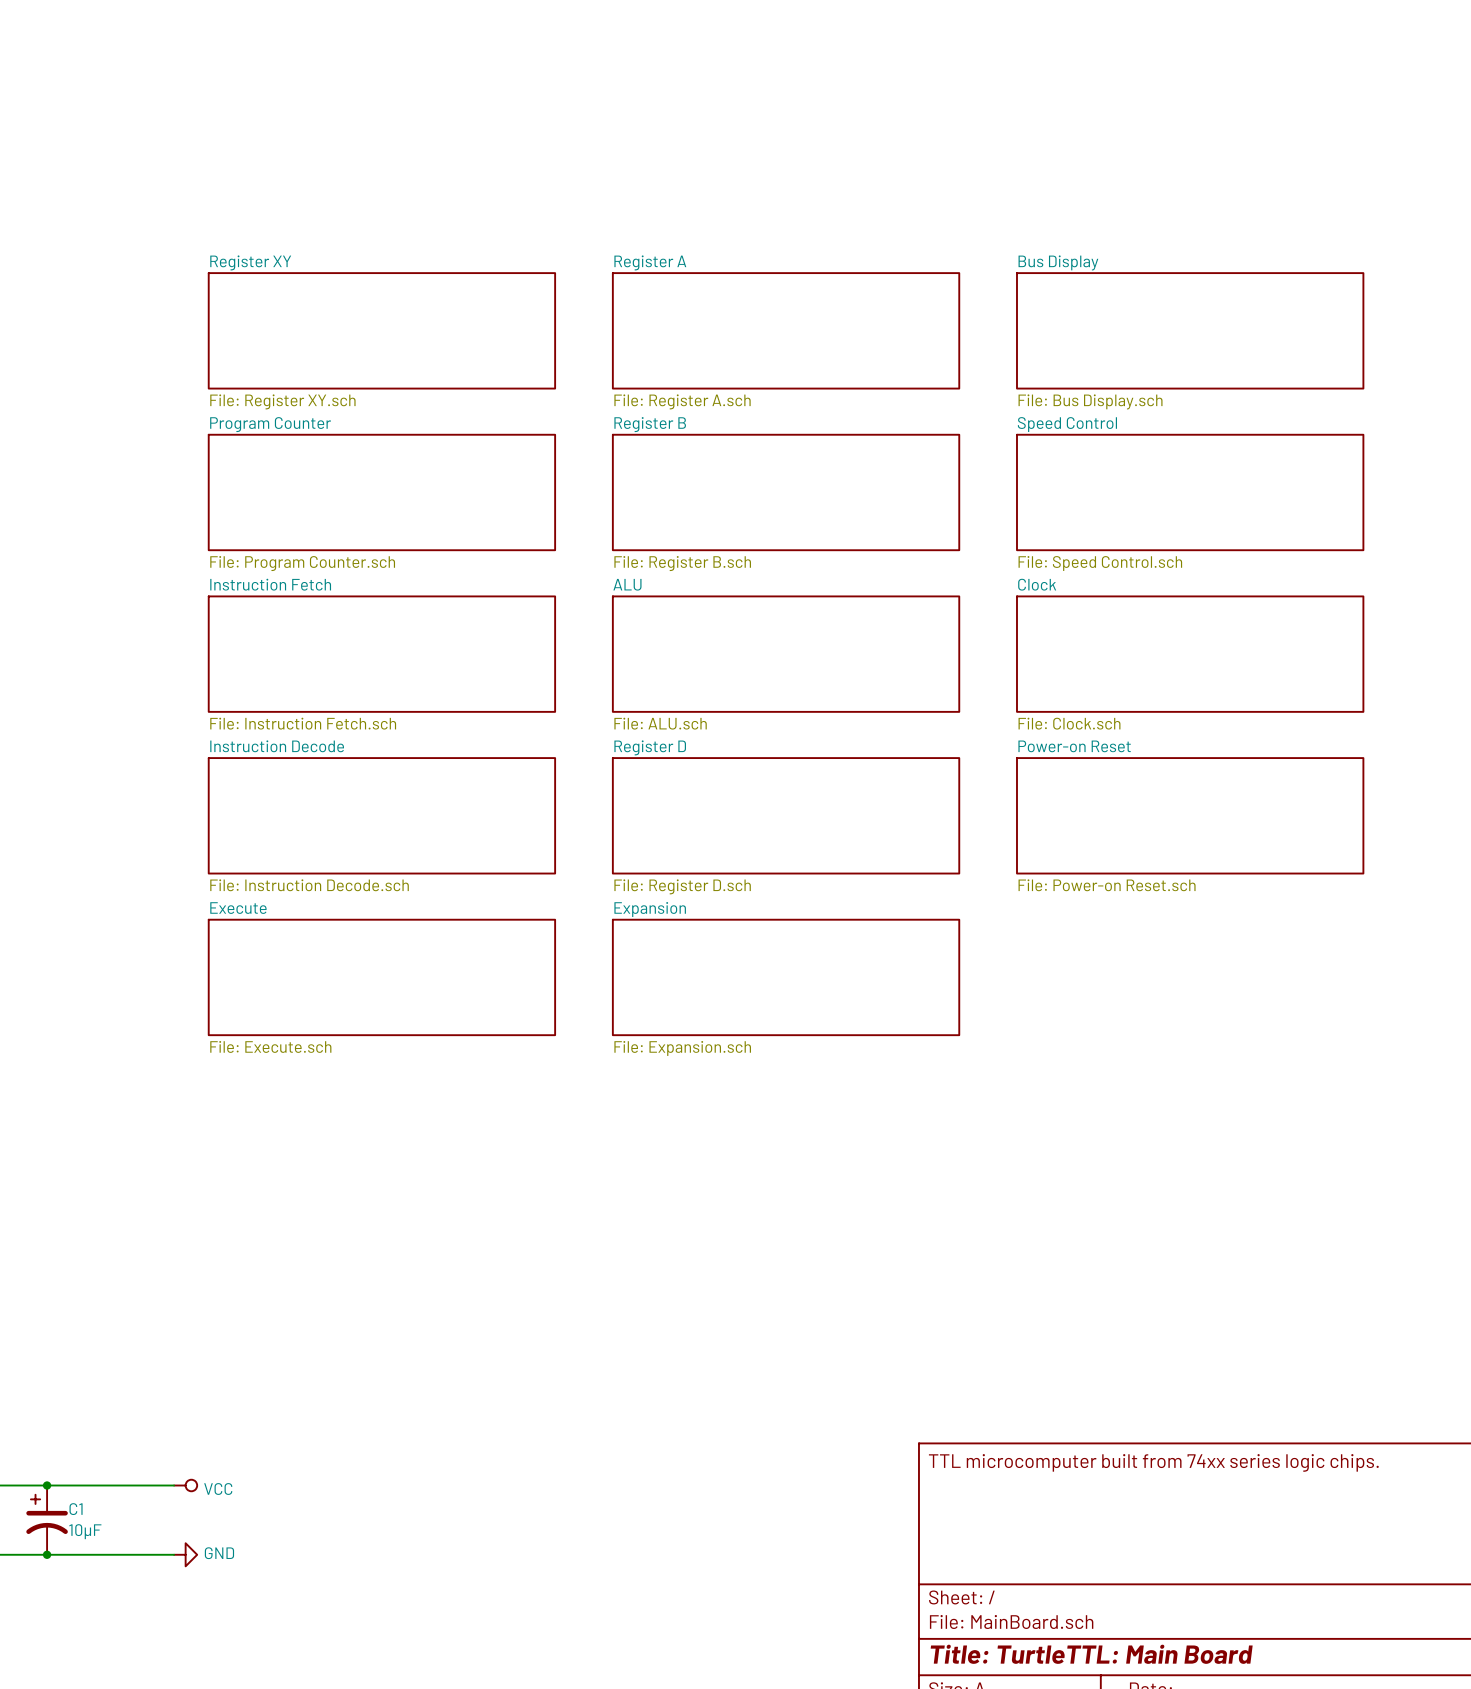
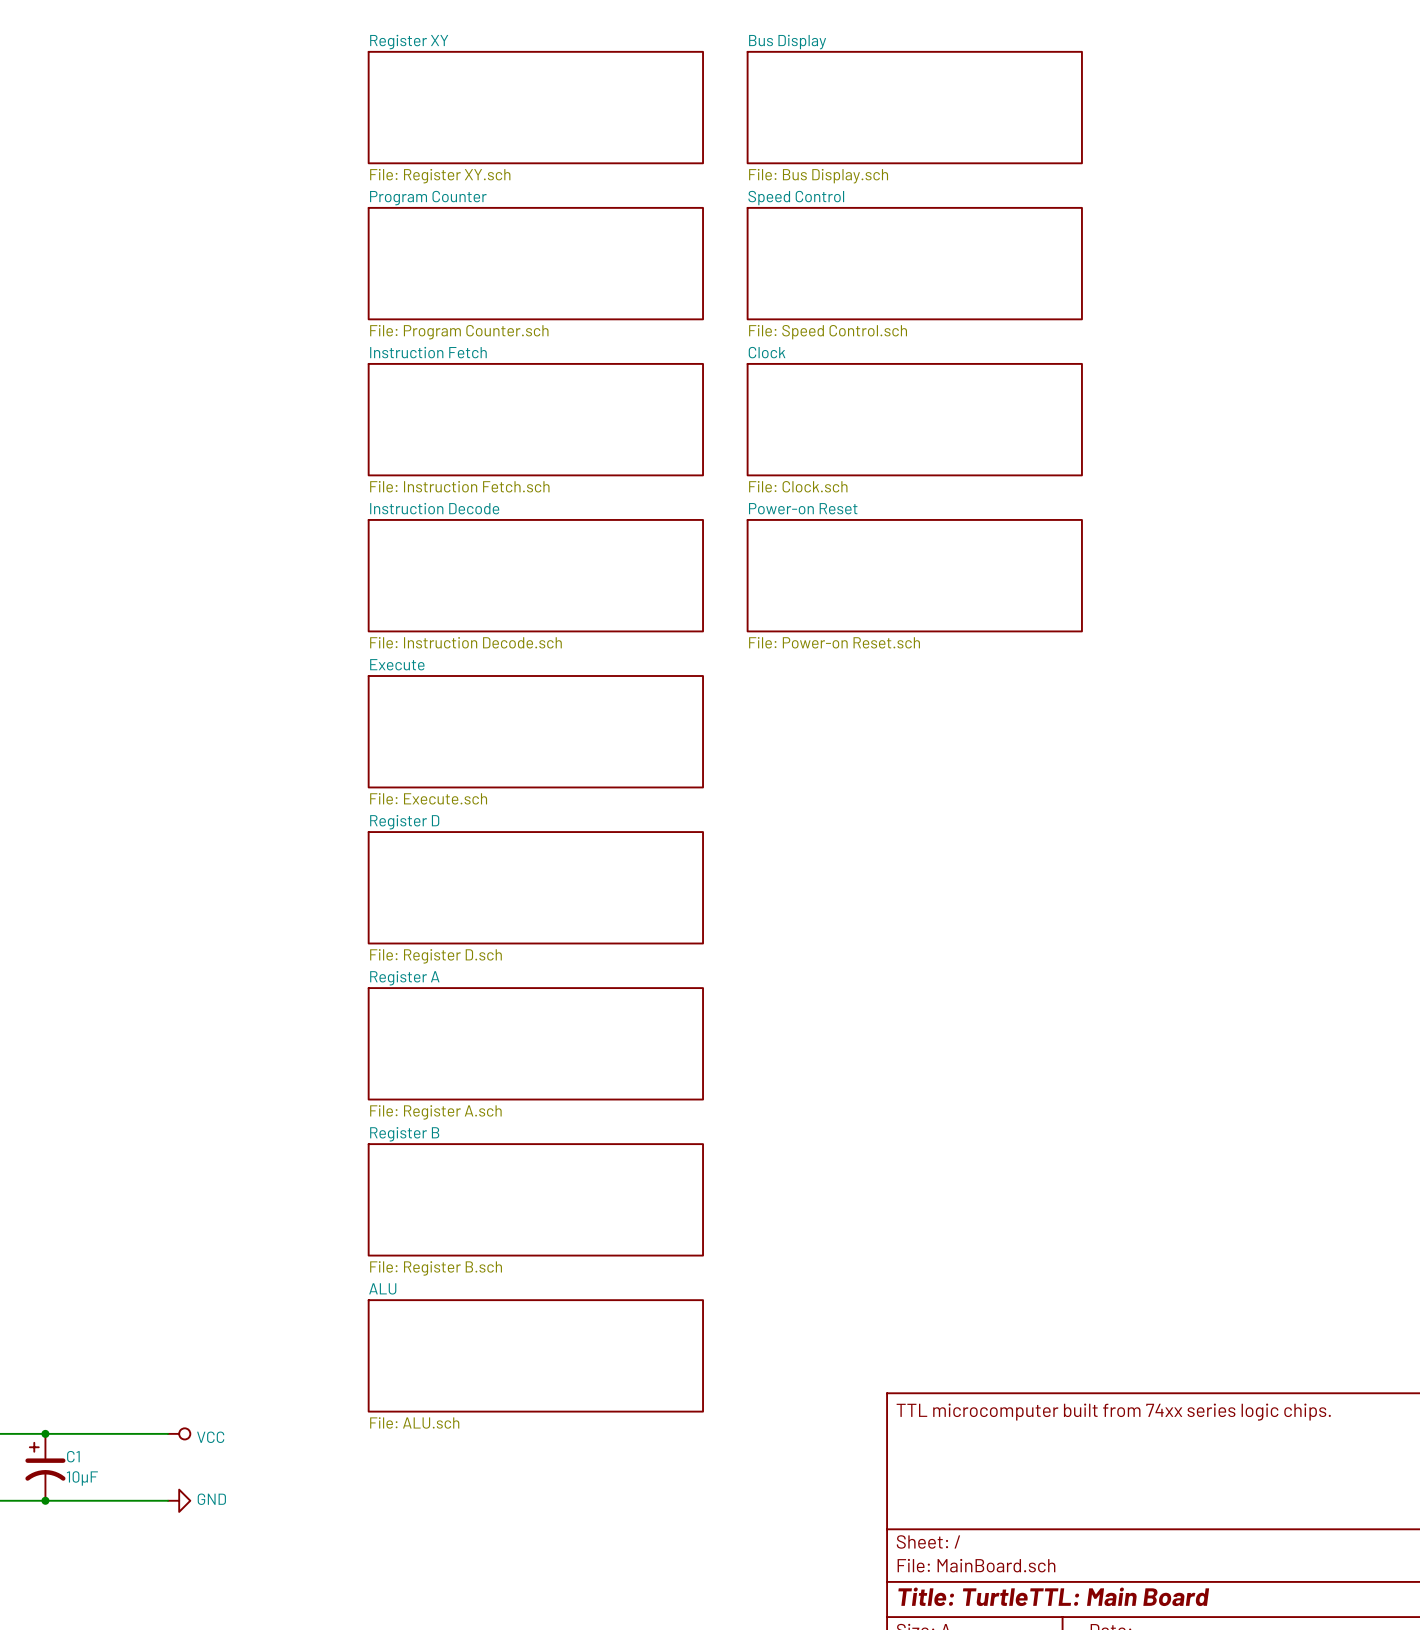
sheet Register XY: none -> File: Register XY.sch (535, 107)
sheet Bus Display: none -> File: Bus Display.sch (914, 107)
sheet Program Counter: none -> File: Program Counter.sch (535, 263)
sheet Speed Control: none -> File: Speed Control.sch (914, 263)
sheet Register XY: File: Register XY.sch (381, 330) -> none
sheet Register A: File: Register A.sch (786, 330) -> none
sheet Bus Display: File: Bus Display.sch (1190, 330) -> none
sheet Instruction Fetch: none -> File: Instruction Fetch.sch (535, 419)
sheet Clock: none -> File: Clock.sch (914, 419)
sheet Program Counter: File: Program Counter.sch (381, 492) -> none
sheet Register B: File: Register B.sch (786, 492) -> none
sheet Speed Control: File: Speed Control.sch (1190, 492) -> none
sheet Instruction Decode: none -> File: Instruction Decode.sch (535, 575)
sheet Power-on Reset: none -> File: Power-on Reset.sch (914, 575)
sheet Instruction Fetch: File: Instruction Fetch.sch (381, 654) -> none
sheet ALU: File: ALU.sch (786, 654) -> none
sheet Clock: File: Clock.sch (1190, 654) -> none
sheet Execute: none -> File: Execute.sch (535, 731)
sheet Instruction Decode: File: Instruction Decode.sch (381, 815) -> none
sheet Register D: File: Register D.sch (786, 815) -> none
sheet Power-on Reset: File: Power-on Reset.sch (1190, 815) -> none
sheet Register D: none -> File: Register D.sch (535, 887)
sheet Execute: File: Execute.sch (381, 977) -> none
sheet Expansion: File: Expansion.sch (786, 977) -> none
sheet Register A: none -> File: Register A.sch (535, 1043)
sheet Register B: none -> File: Register B.sch (535, 1199)
sheet ALU: none -> File: ALU.sch (535, 1355)

